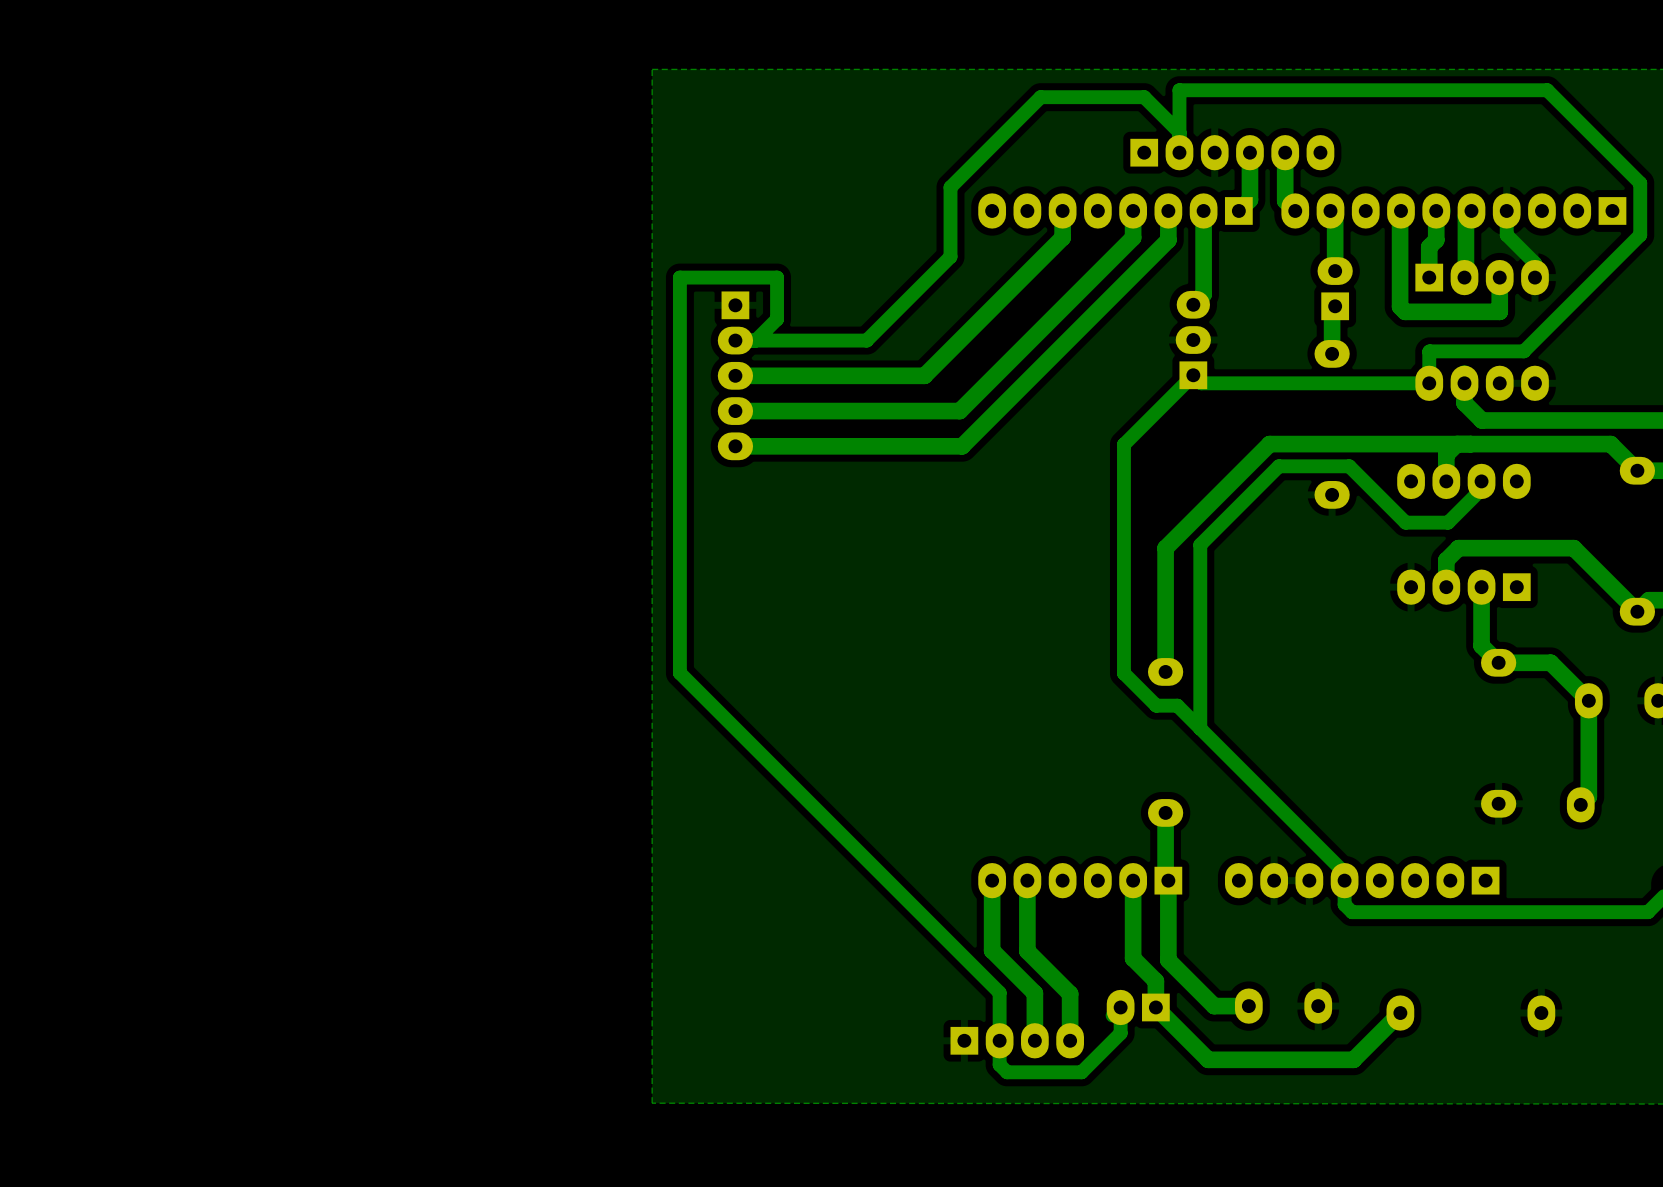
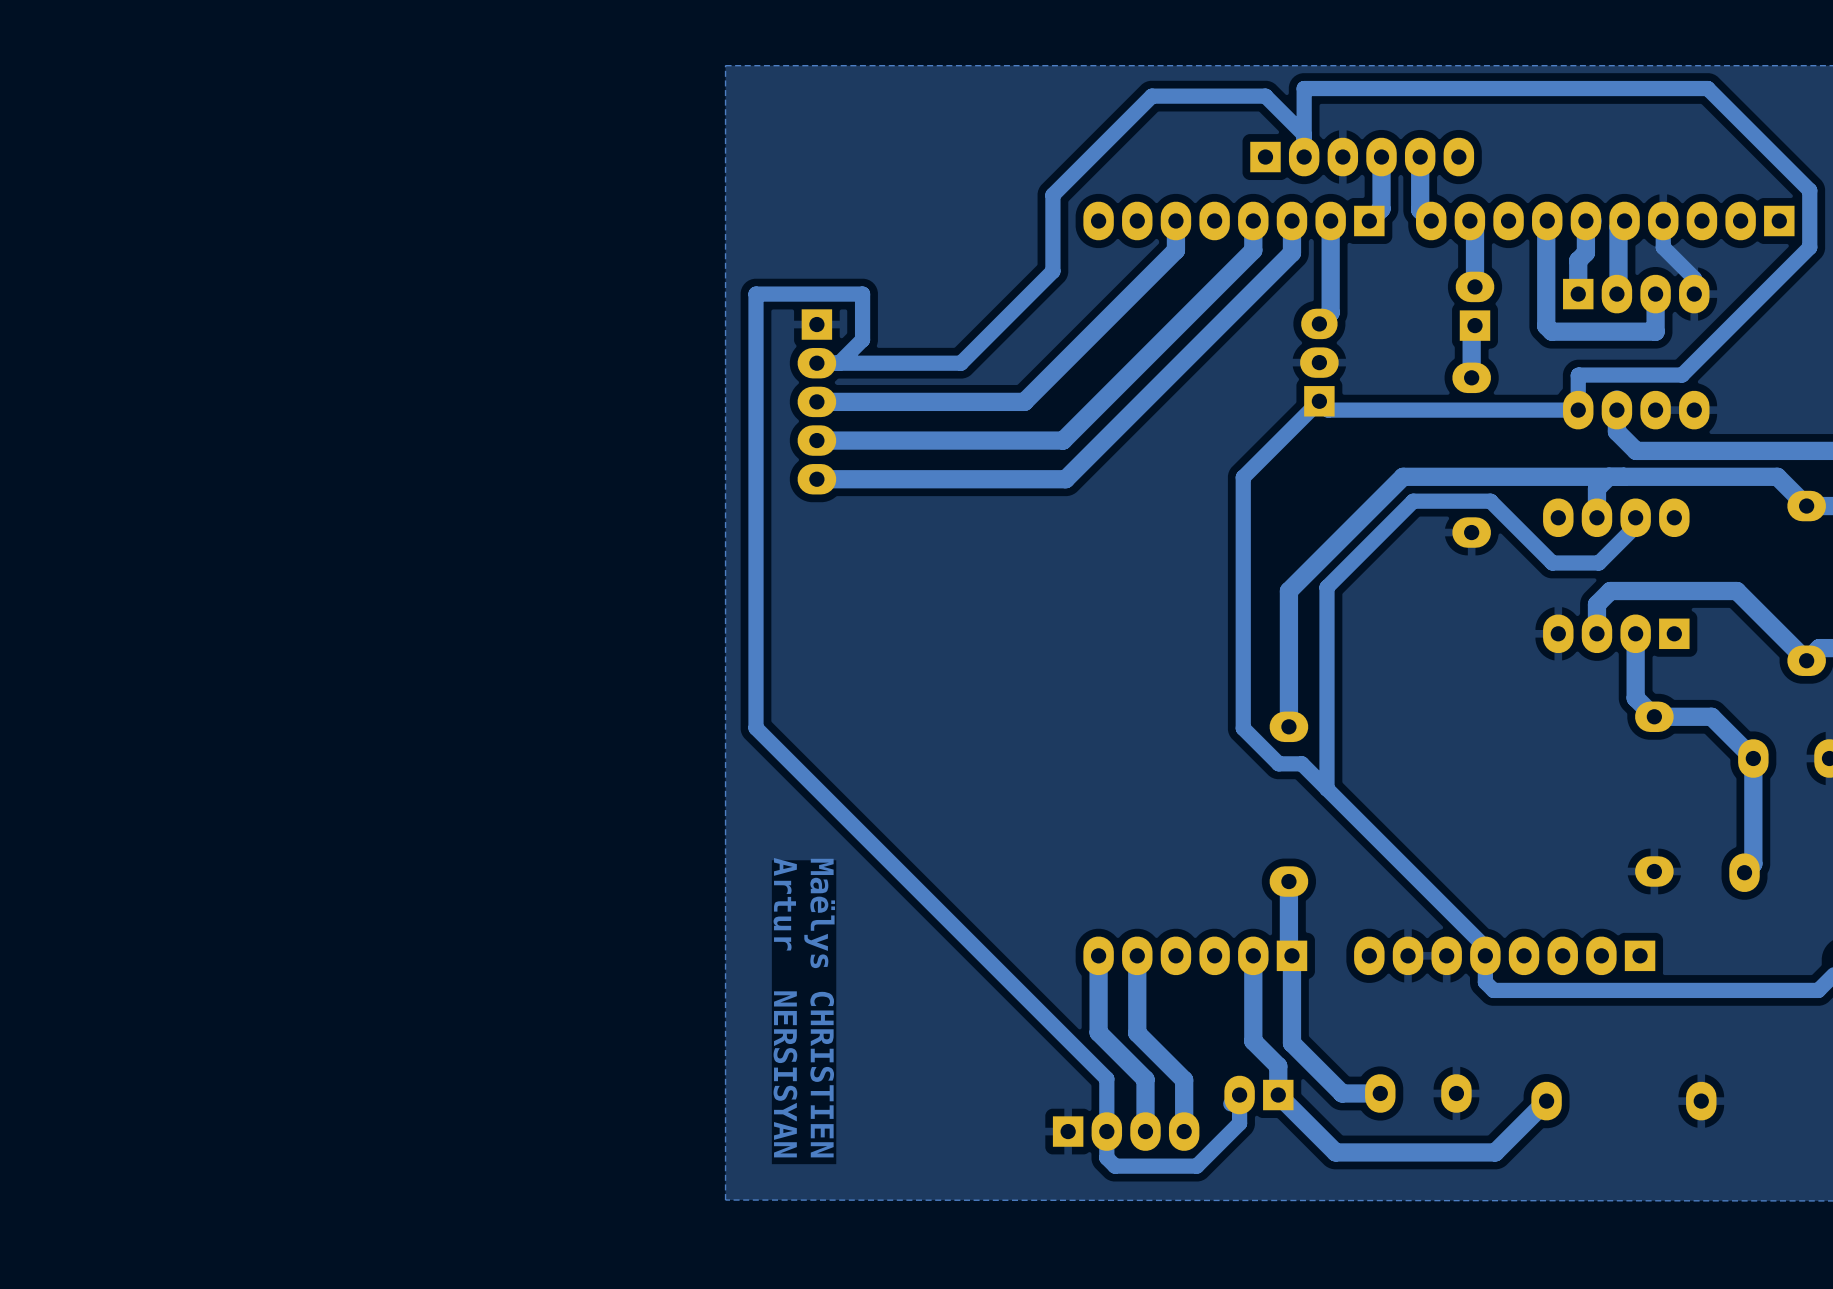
text: none -> Artur NERSISYAN (785, 1007)
text: none -> Maëlys CHRISTIEN (819, 1008)

